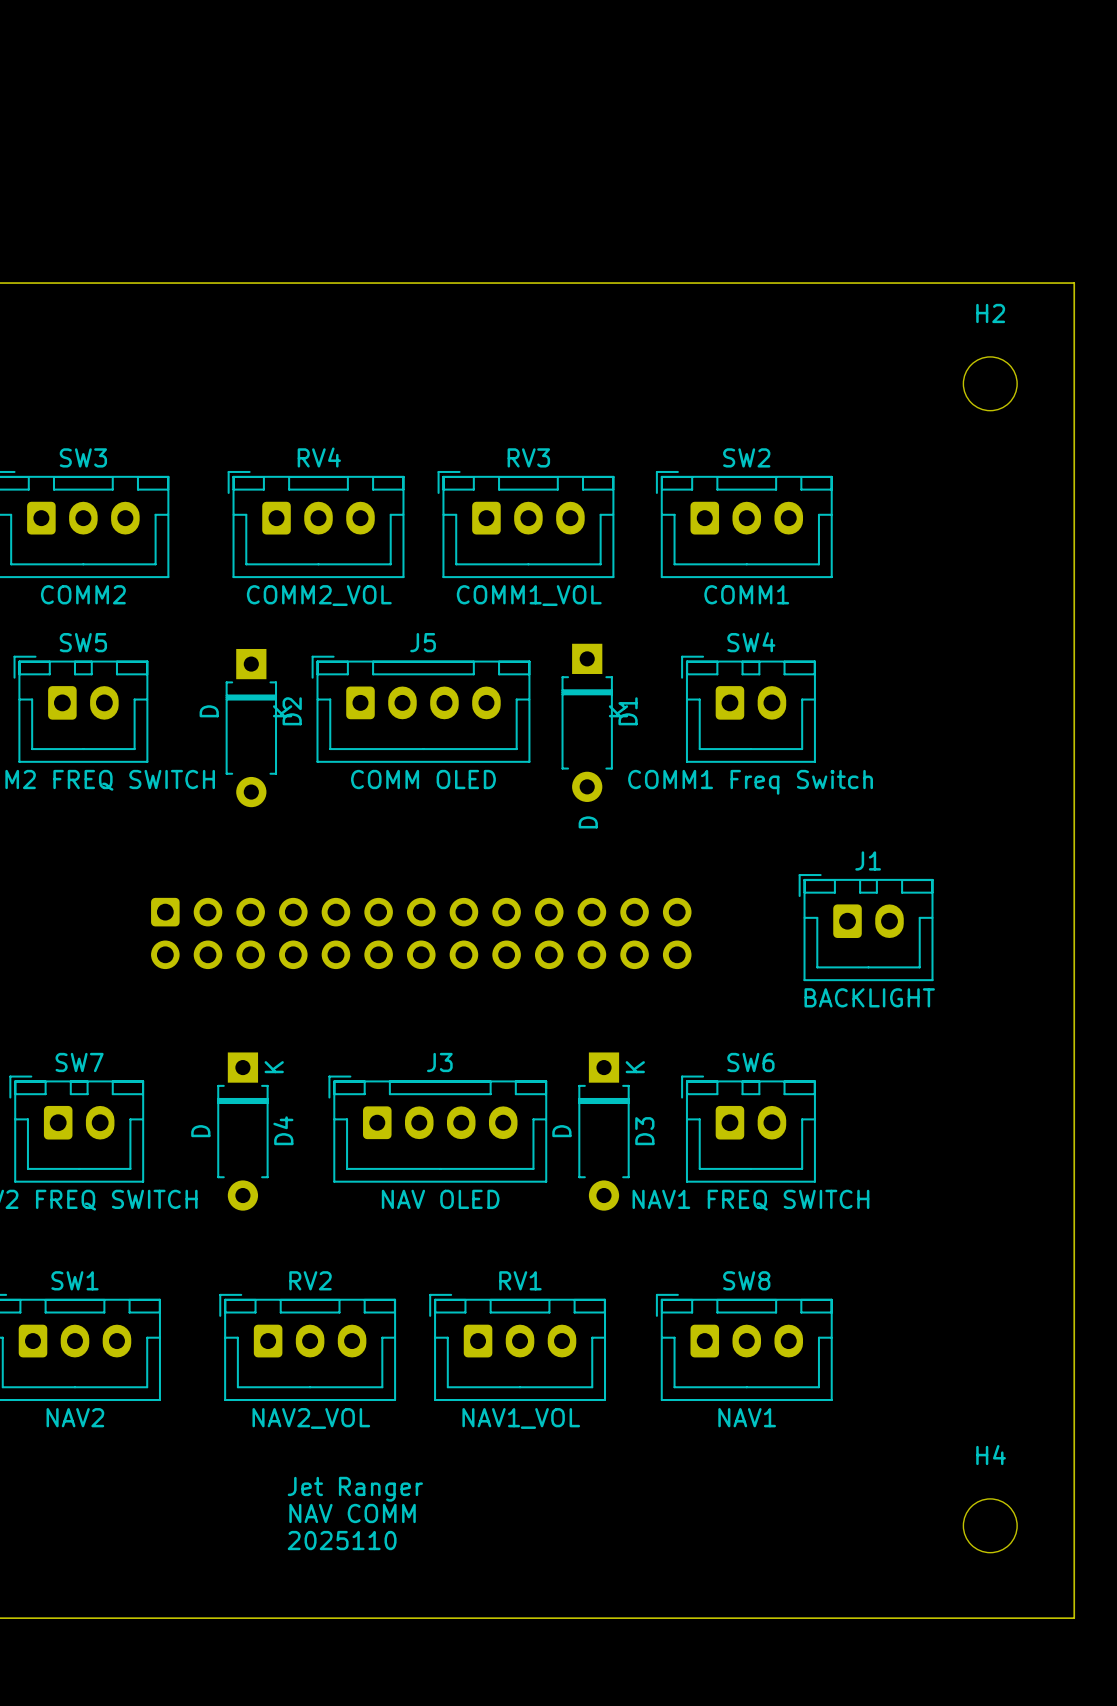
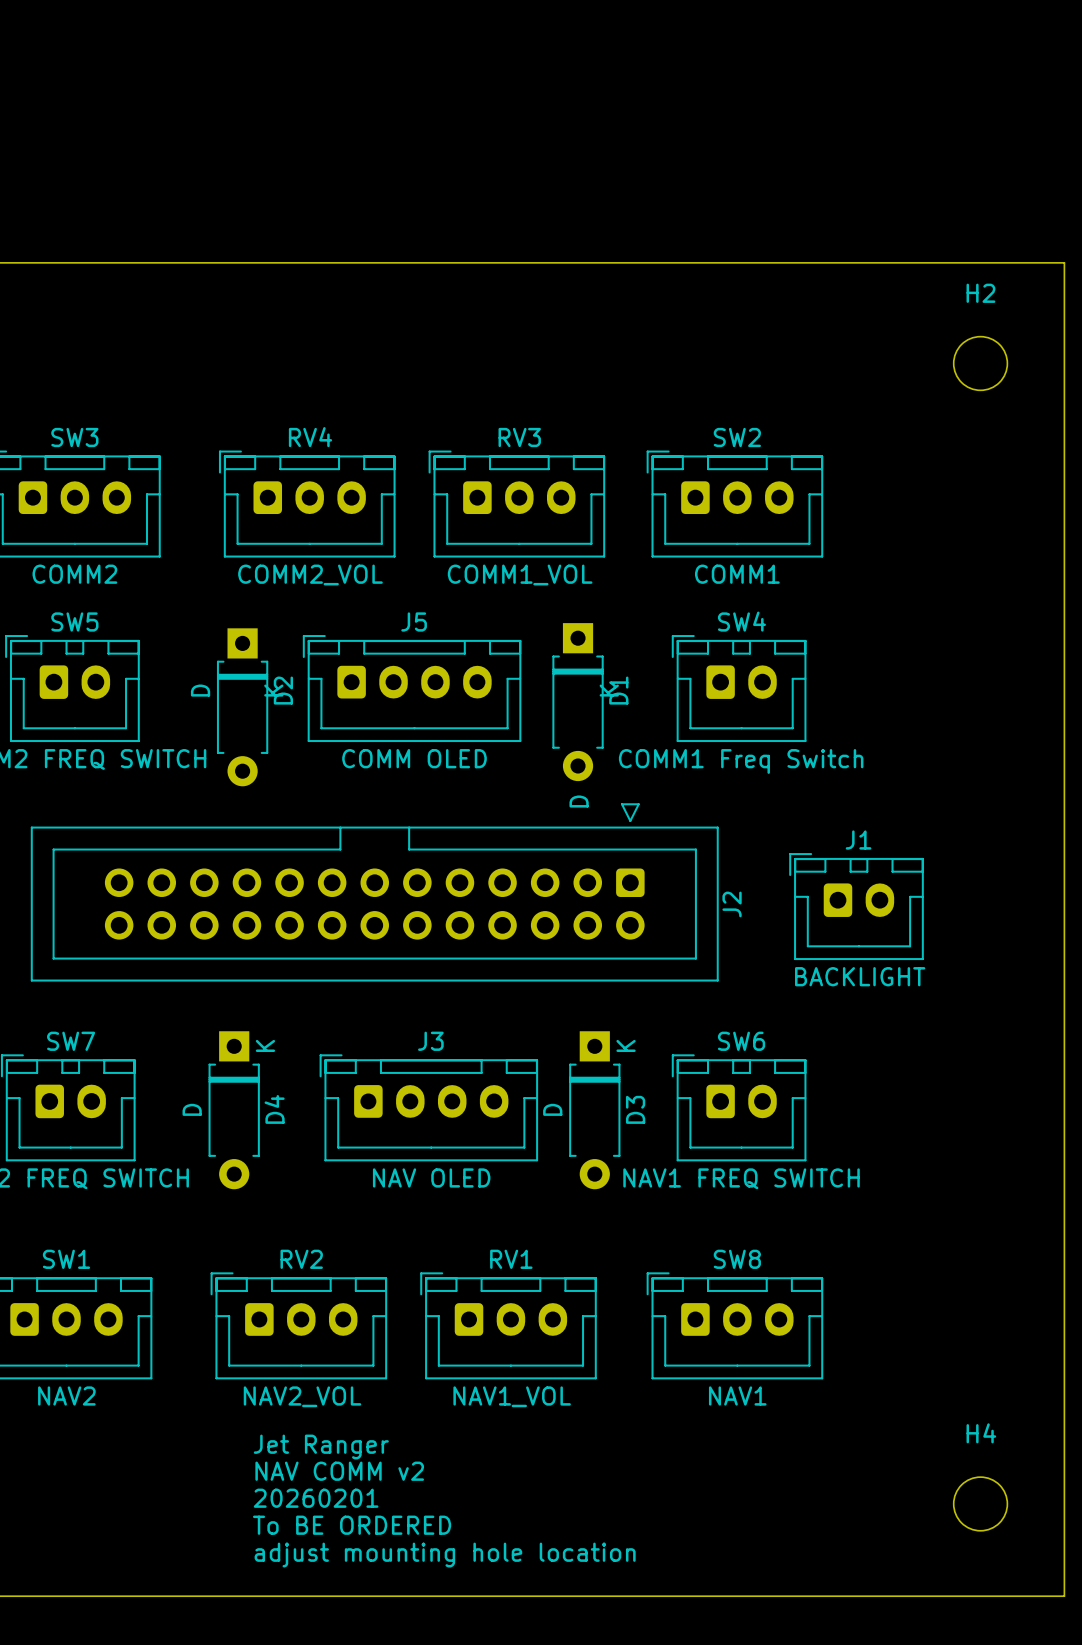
J2 side: bottom (421, 933) -> top (374, 892)
text position: Jet Ranger (355, 1489) -> Jet Ranger (321, 1447)
text: NAV COMM (352, 1513) -> NAV COMM v2 (339, 1471)
text: none -> 20260201 (316, 1498)
text: 2025110 (342, 1540) -> none
text: none -> To BE ORDERED (352, 1525)
text: none -> adjust mounting hole location (445, 1555)

